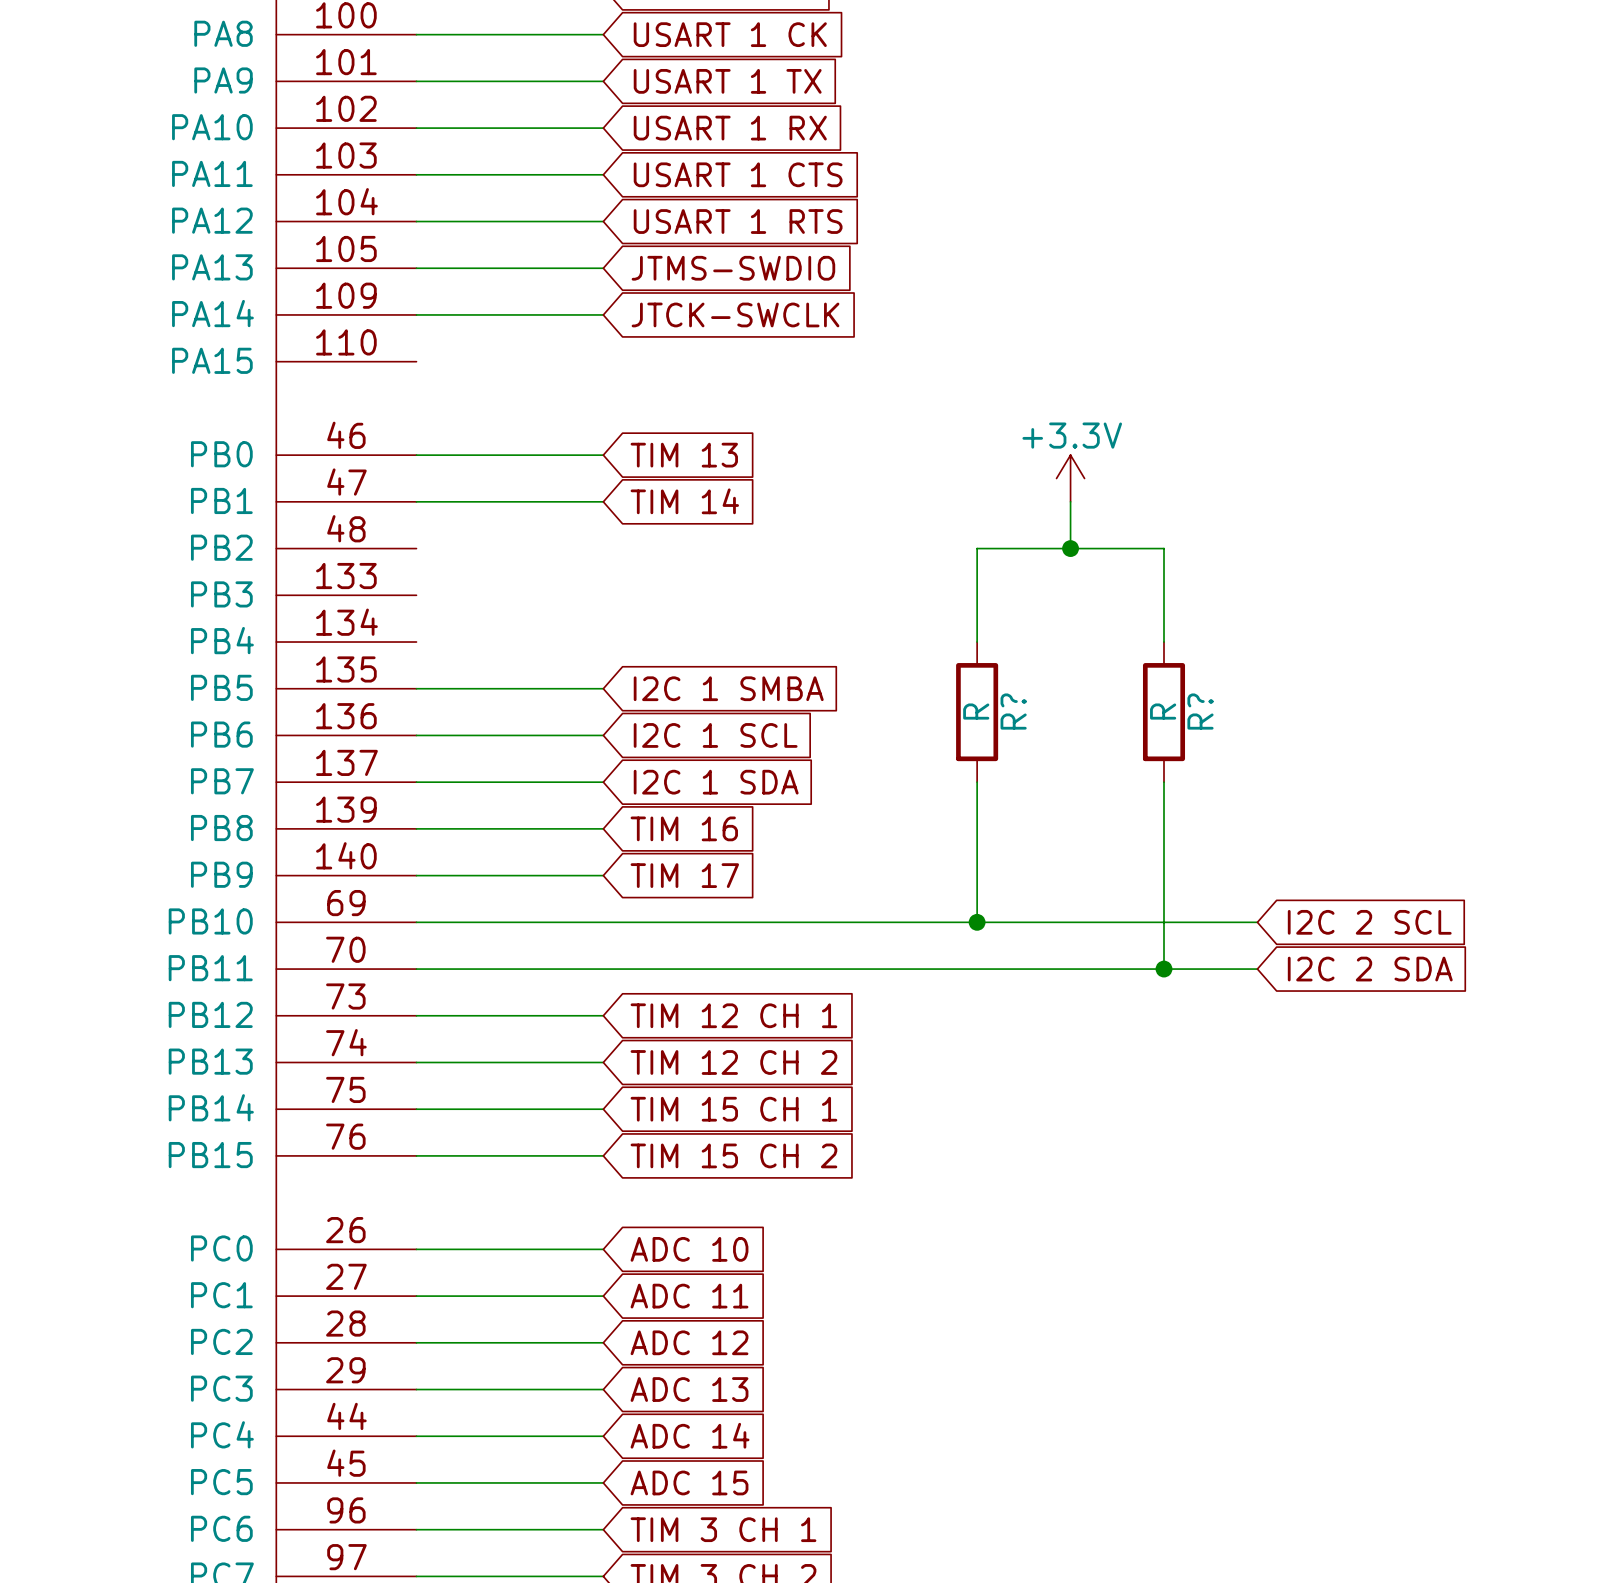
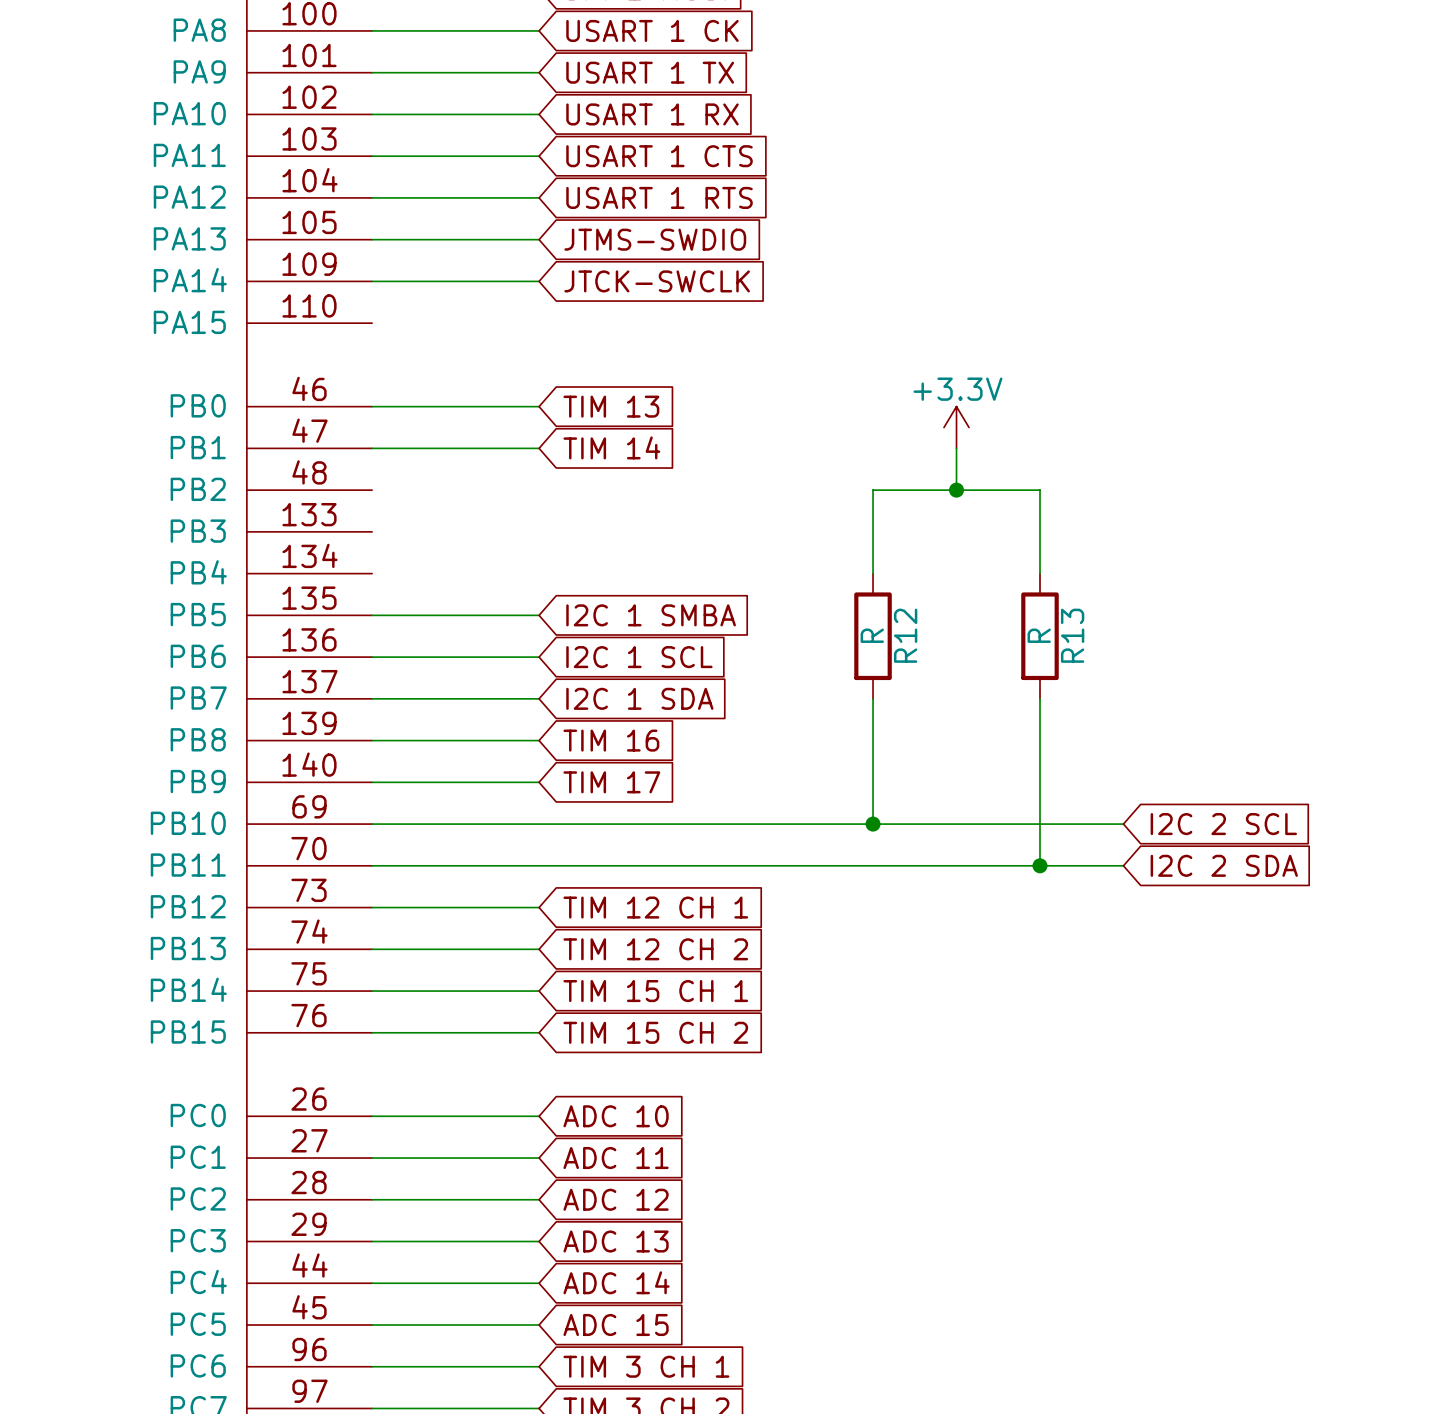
R? name: R? (1013, 711) -> R12 (905, 635)
R? name: R? (1200, 711) -> R13 (1072, 635)

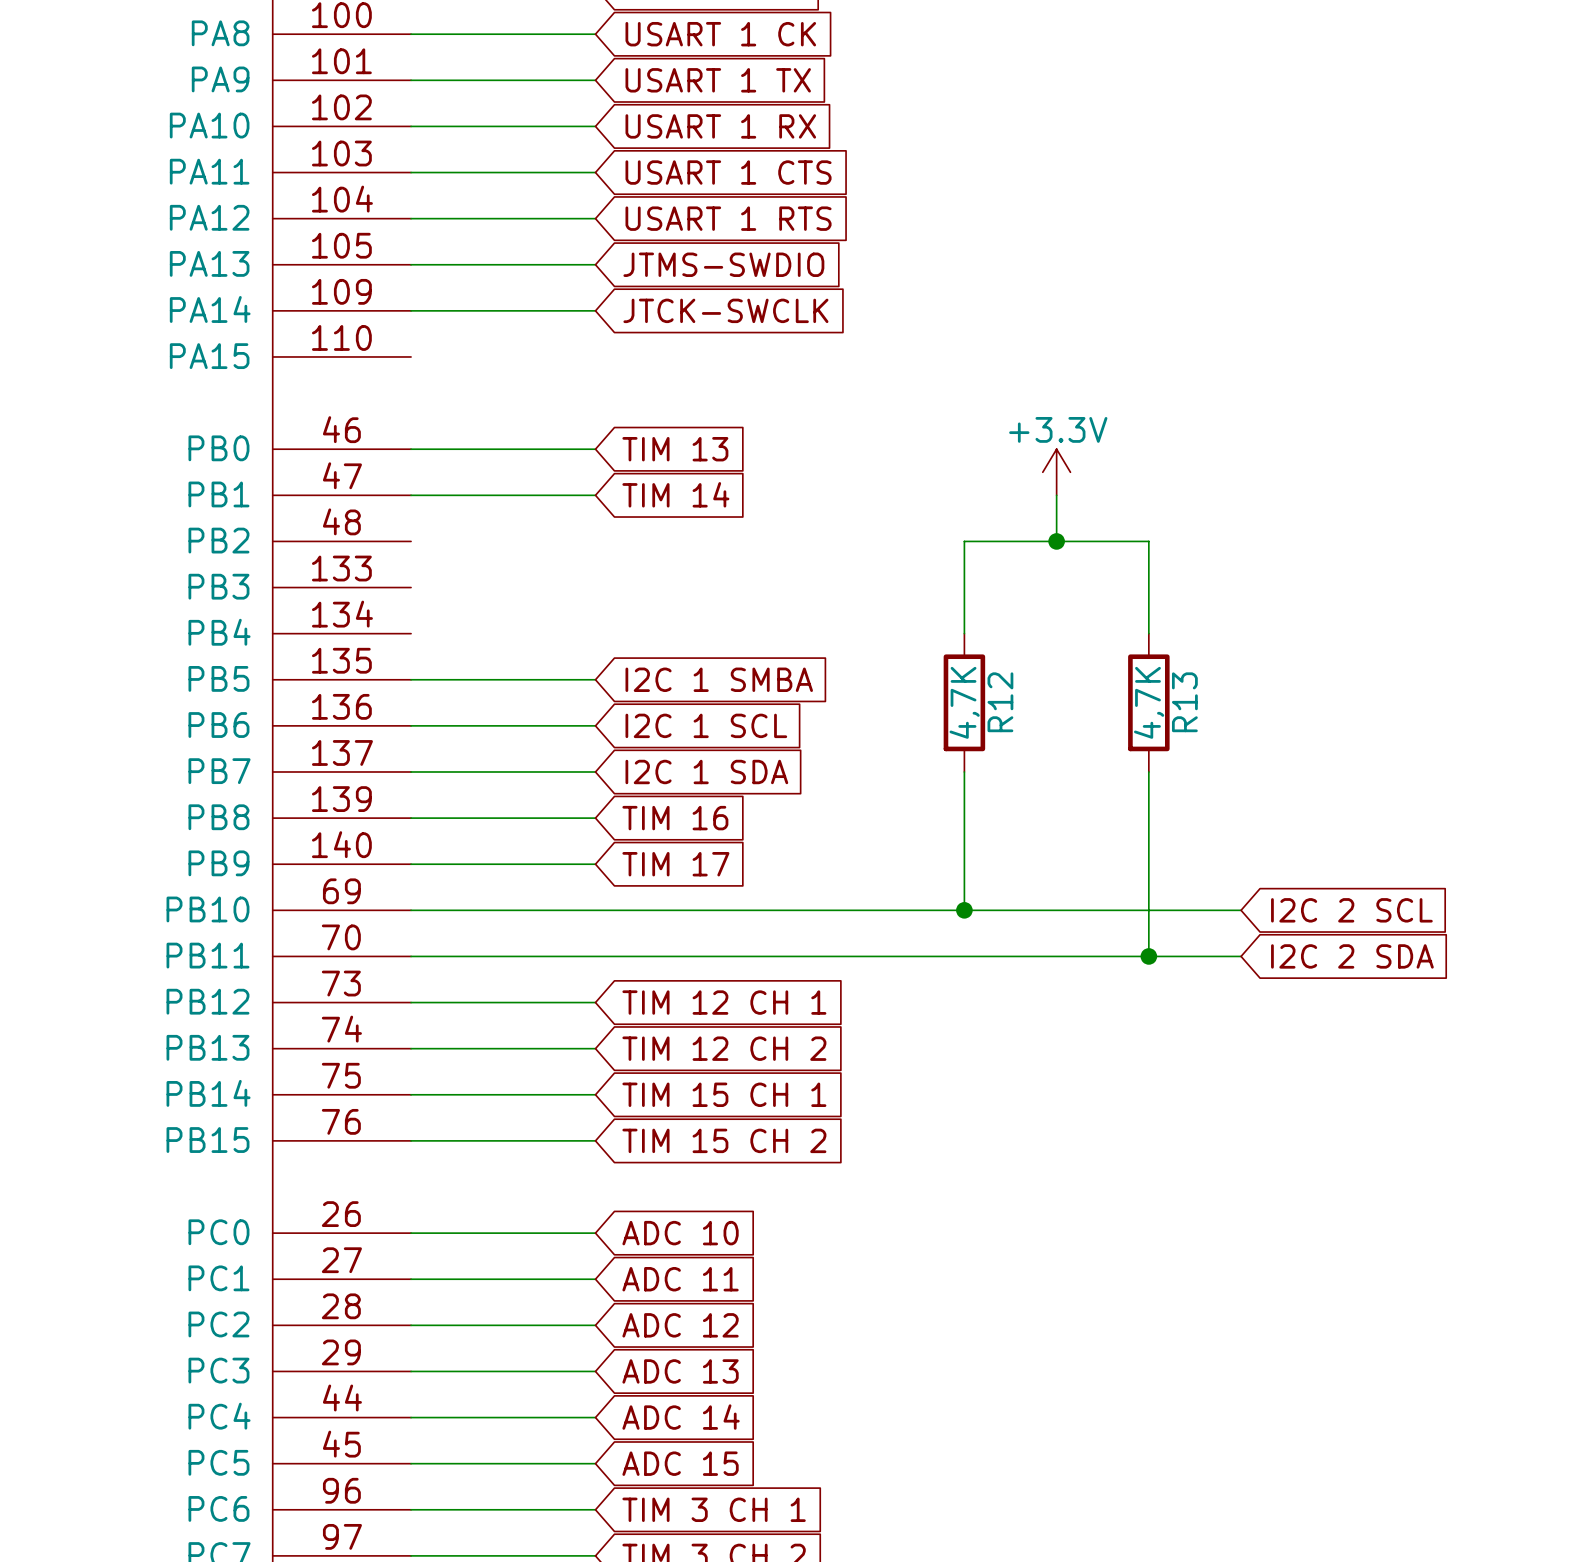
R12 value: R (872, 635) -> 4,7K (964, 702)
R13 value: R (1039, 635) -> 4,7K (1149, 702)

